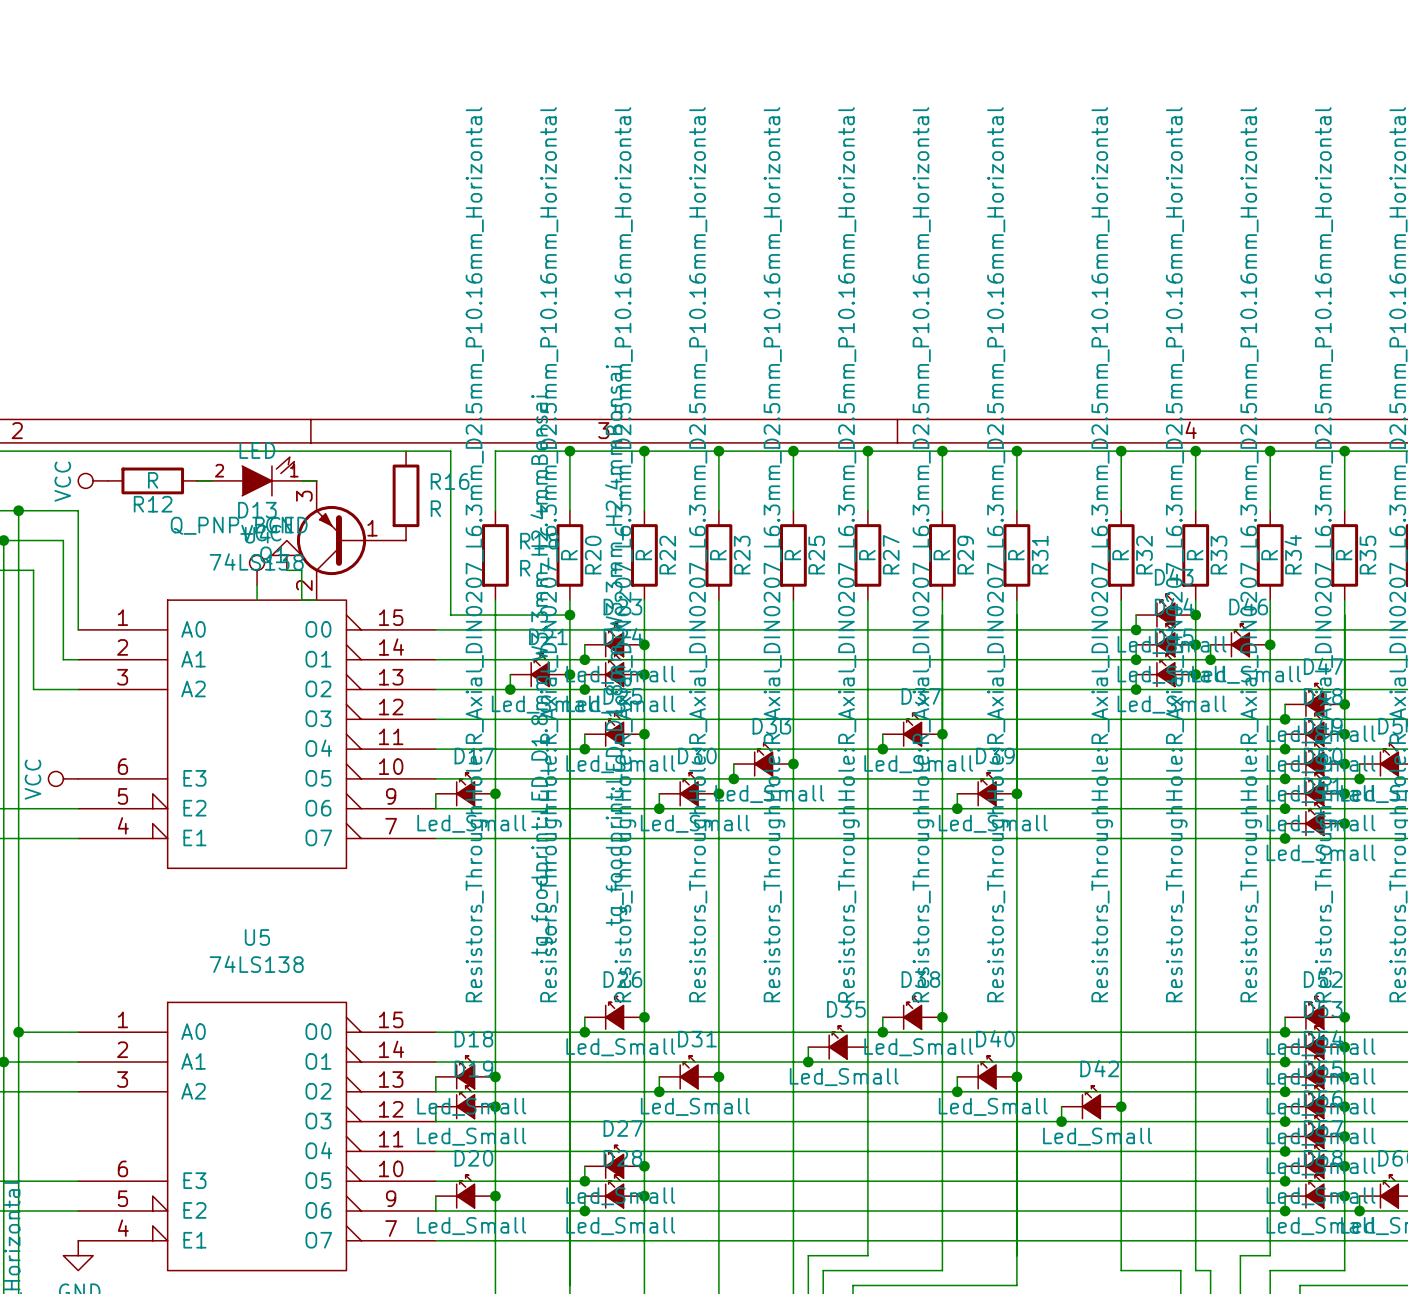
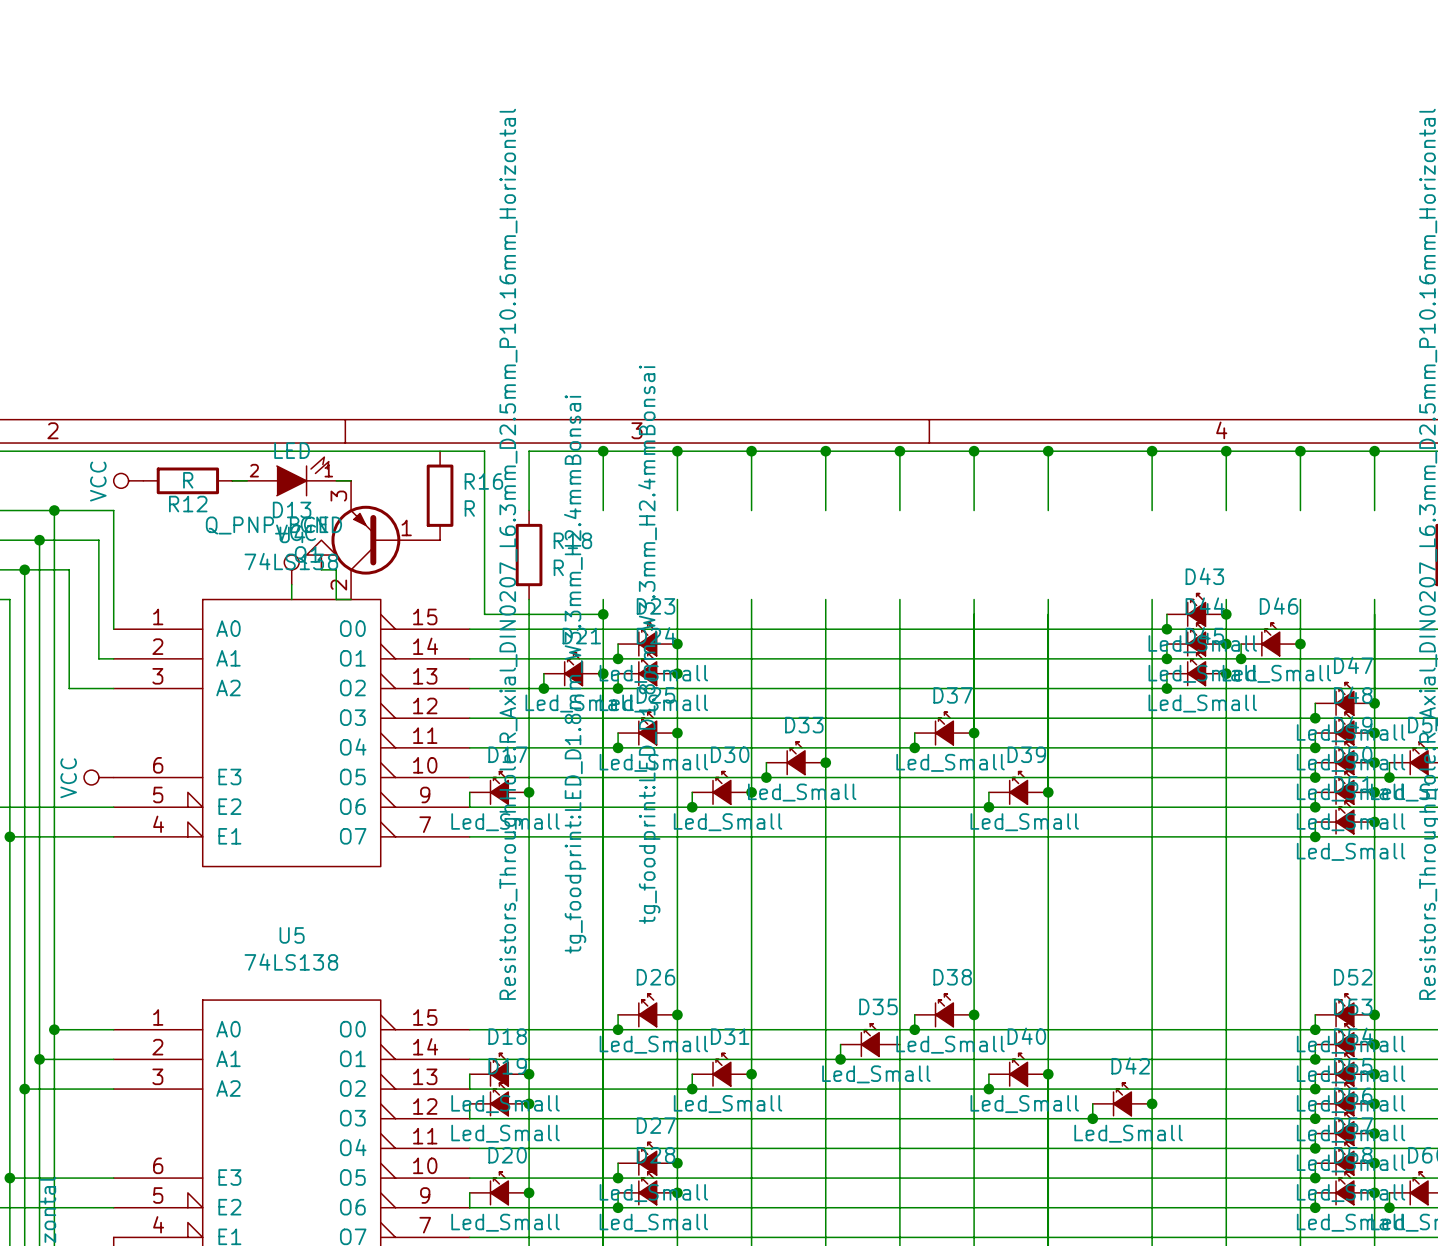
R20: R (569, 555) -> none
R22: R (644, 555) -> none
R23: R (718, 555) -> none
R25: R (793, 555) -> none
R27: R (867, 555) -> none
R29: R (942, 555) -> none
R31: R (1016, 555) -> none
R32: R (1121, 555) -> none
R33: R (1195, 555) -> none
R34: R (1270, 555) -> none
R35: R (1344, 555) -> none

